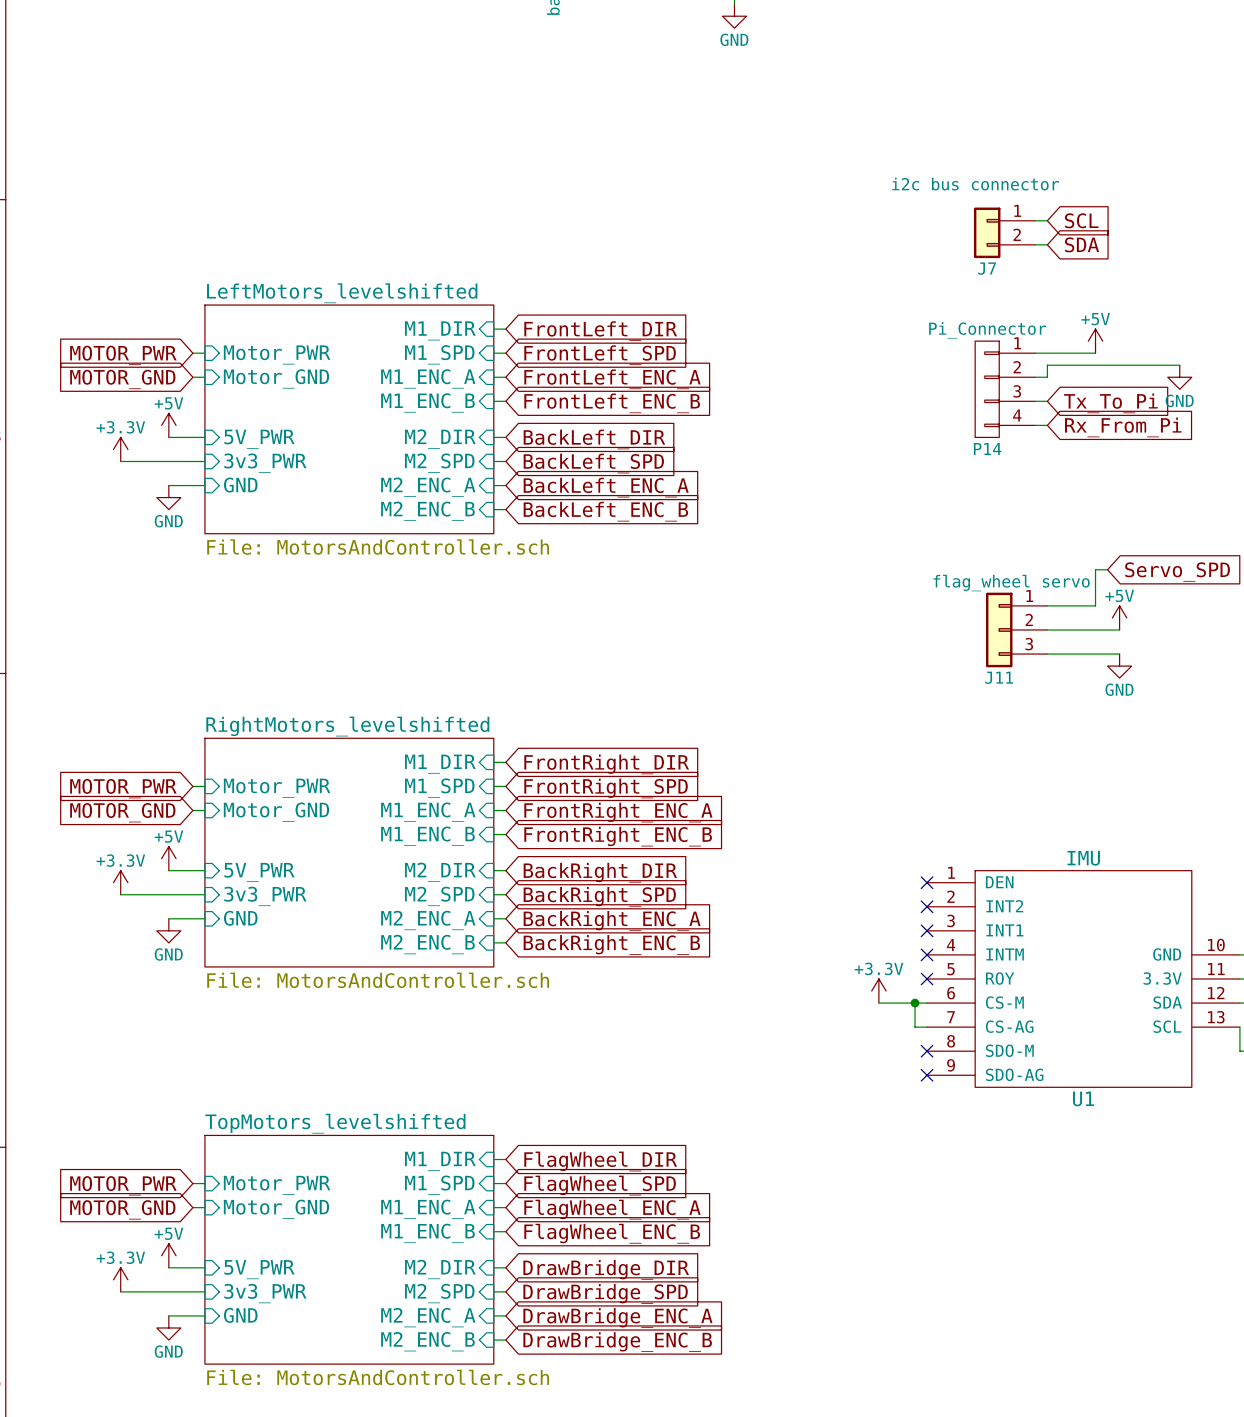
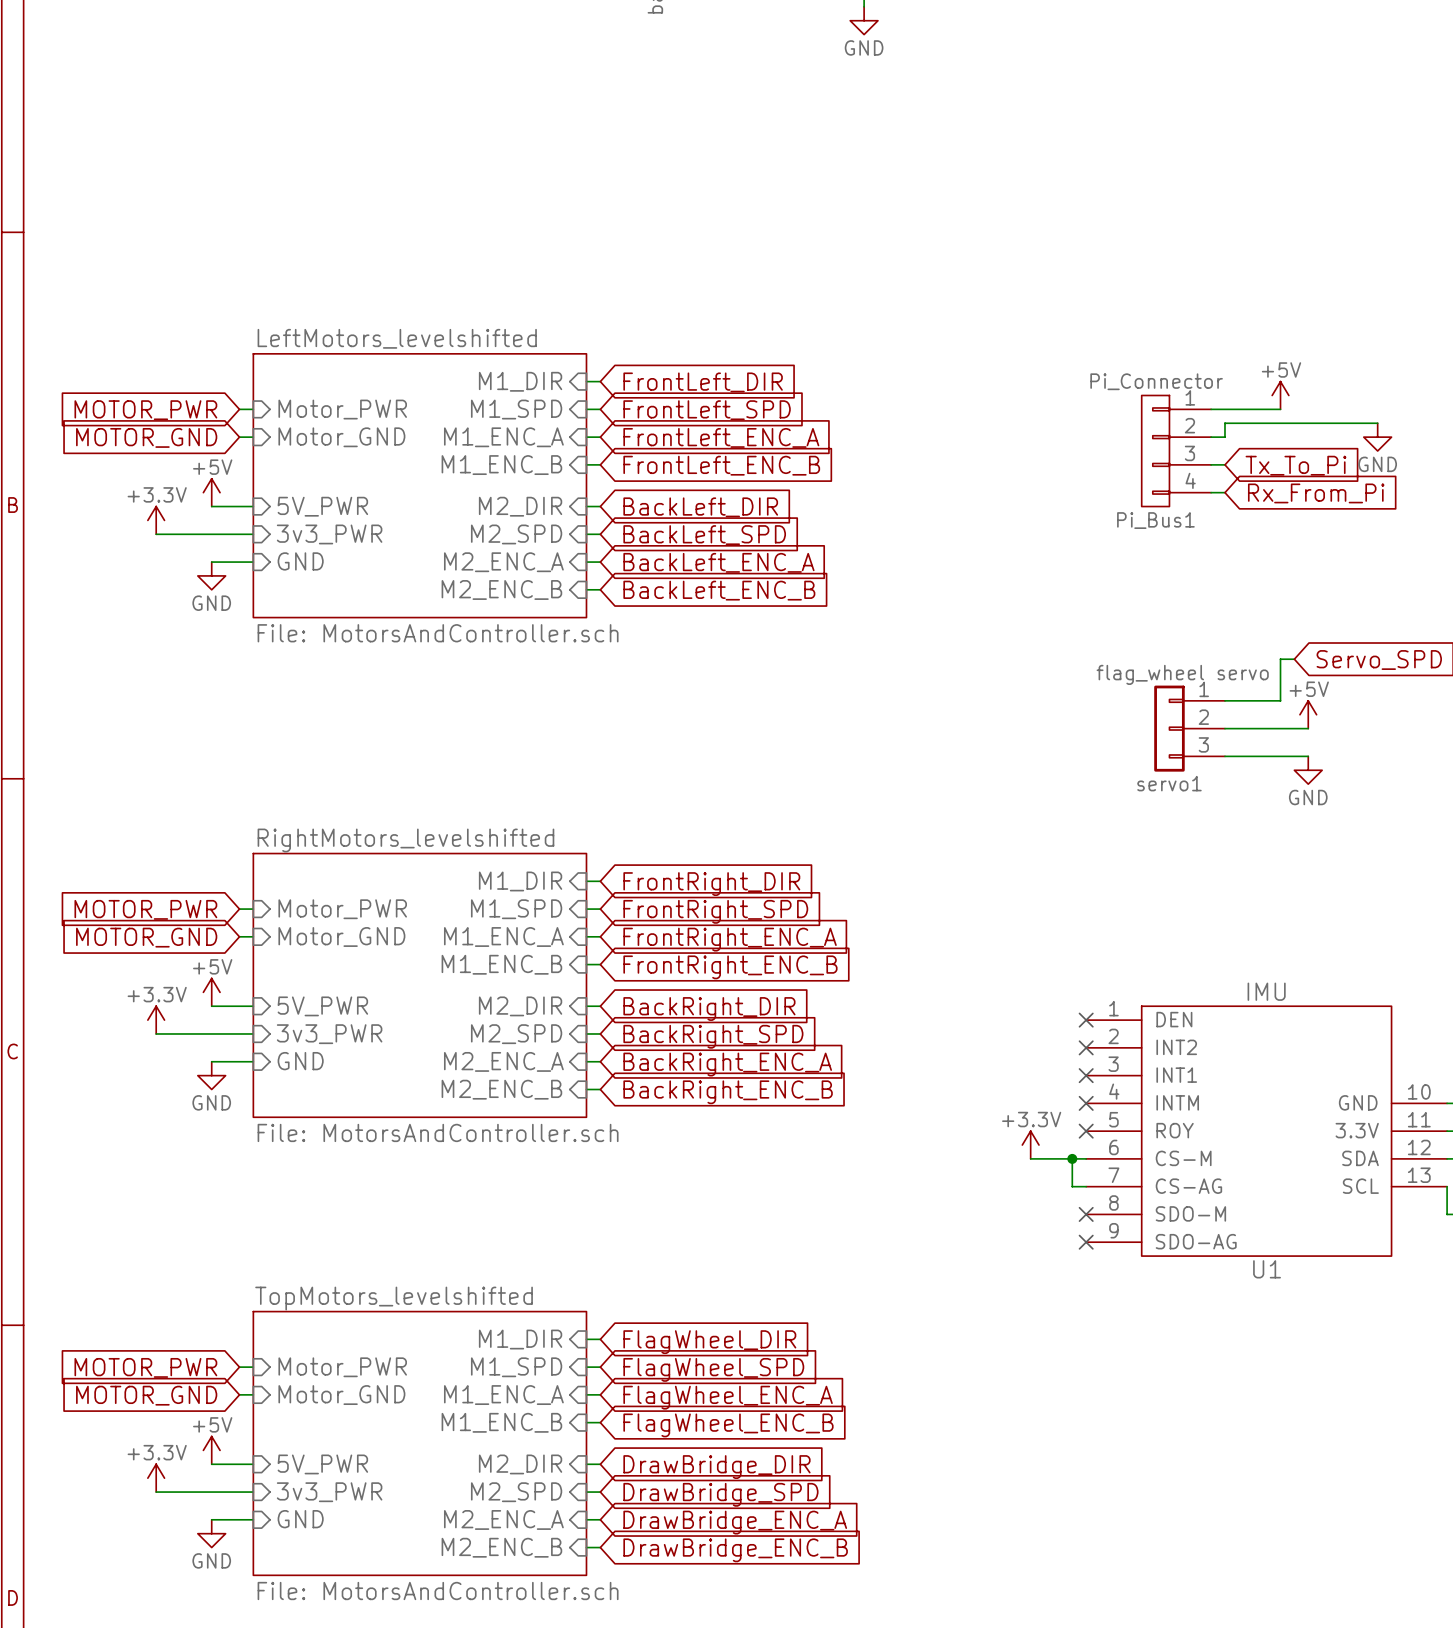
wire: (1035, 220) (1047, 220) -> none
global label: SCL (1081, 220) -> none
J7: i2c bus connector (1004, 232) -> none
wire: (1035, 244) (1047, 244) -> none
global label: SDA (1082, 244) -> none
P14 name: P14 (987, 449) -> Pi_Bus1 (1155, 520)
J11 name: J11 (999, 677) -> servo1 (1169, 783)

